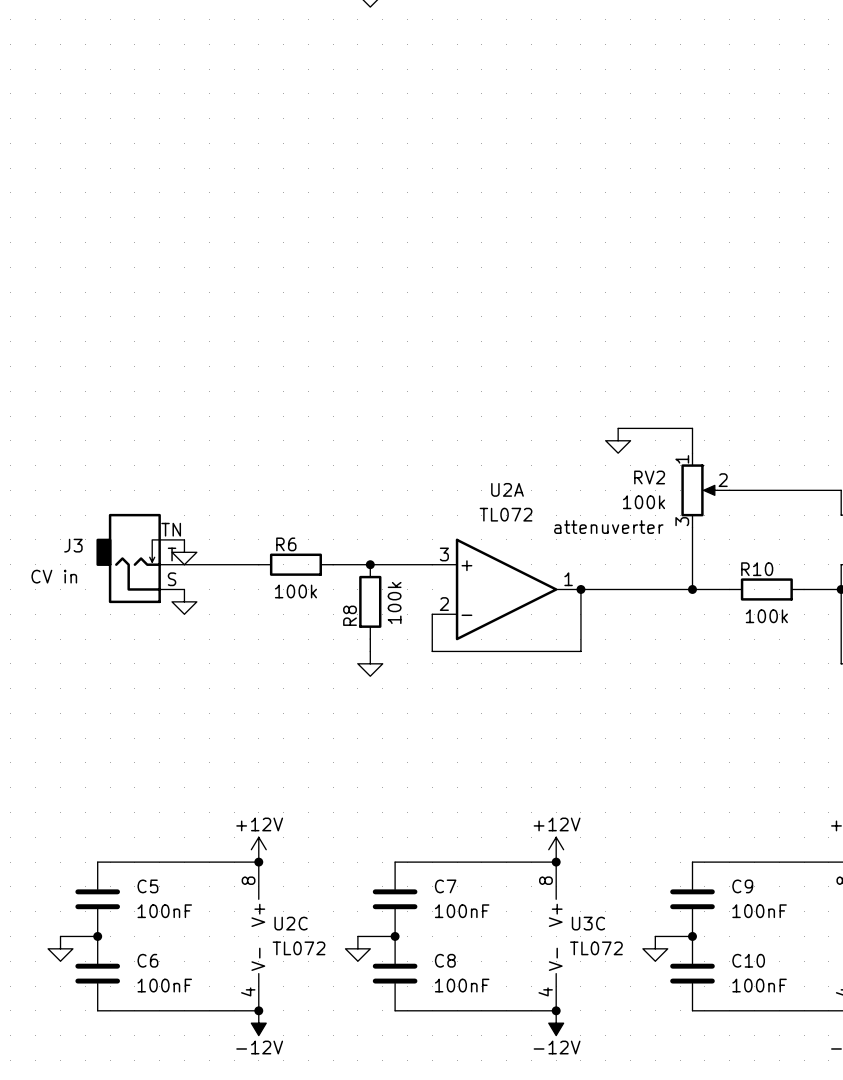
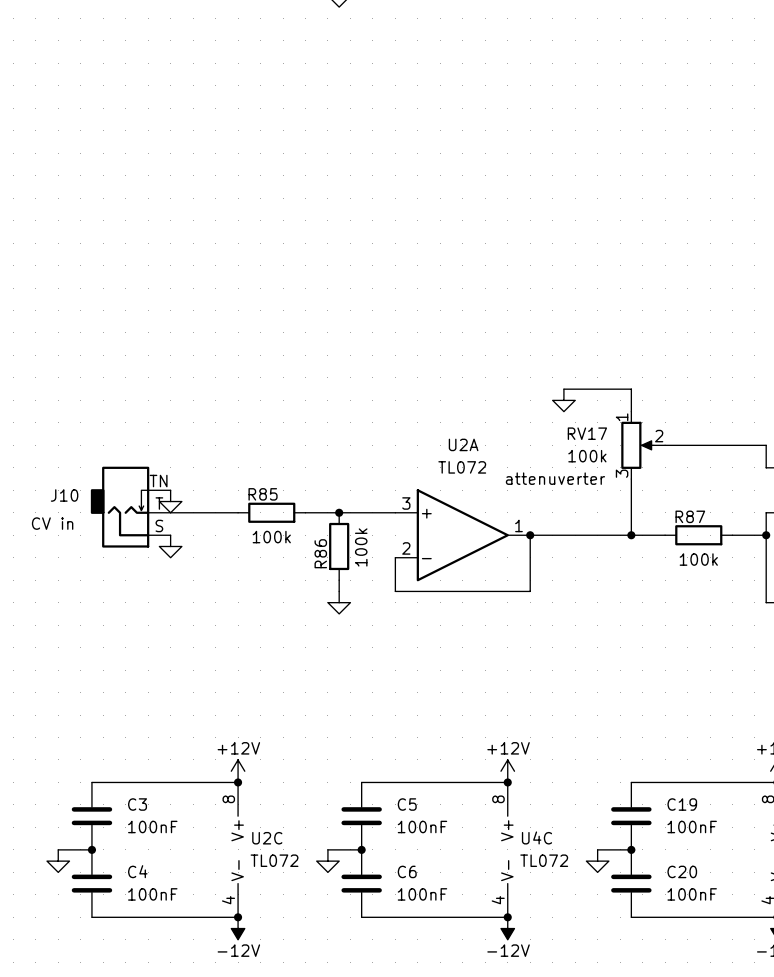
RV2 name: RV2 (649, 477) -> RV17 (587, 433)
R6 name: R6 (286, 544) -> R85 (263, 494)
J3 name: J3 (73, 545) -> J10 (64, 495)
R10 name: R10 (757, 569) -> R87 (690, 516)
R8 name: R8 (350, 615) -> R86 (320, 553)
C5 name: C5 (147, 886) -> C3 (137, 804)
C7 name: C7 (445, 886) -> C5 (407, 804)
C9 name: C9 (742, 886) -> C19 (682, 804)
U3C name: U3C (588, 923) -> U4C (536, 837)
C6 name: C6 (147, 960) -> C4 (137, 871)
C8 name: C8 (445, 960) -> C6 (407, 871)
C10 name: C10 (748, 960) -> C20 (682, 871)

